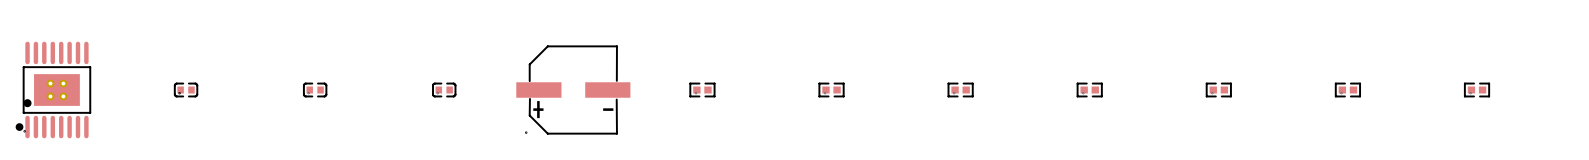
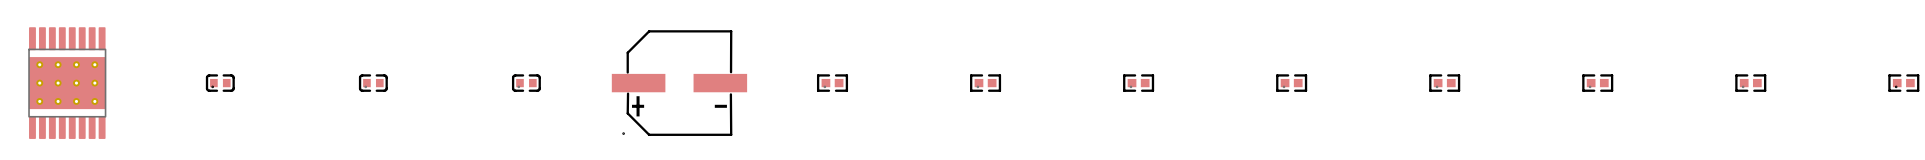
part footprint: [15, 41, 92, 139] -> [28, 27, 107, 139]

